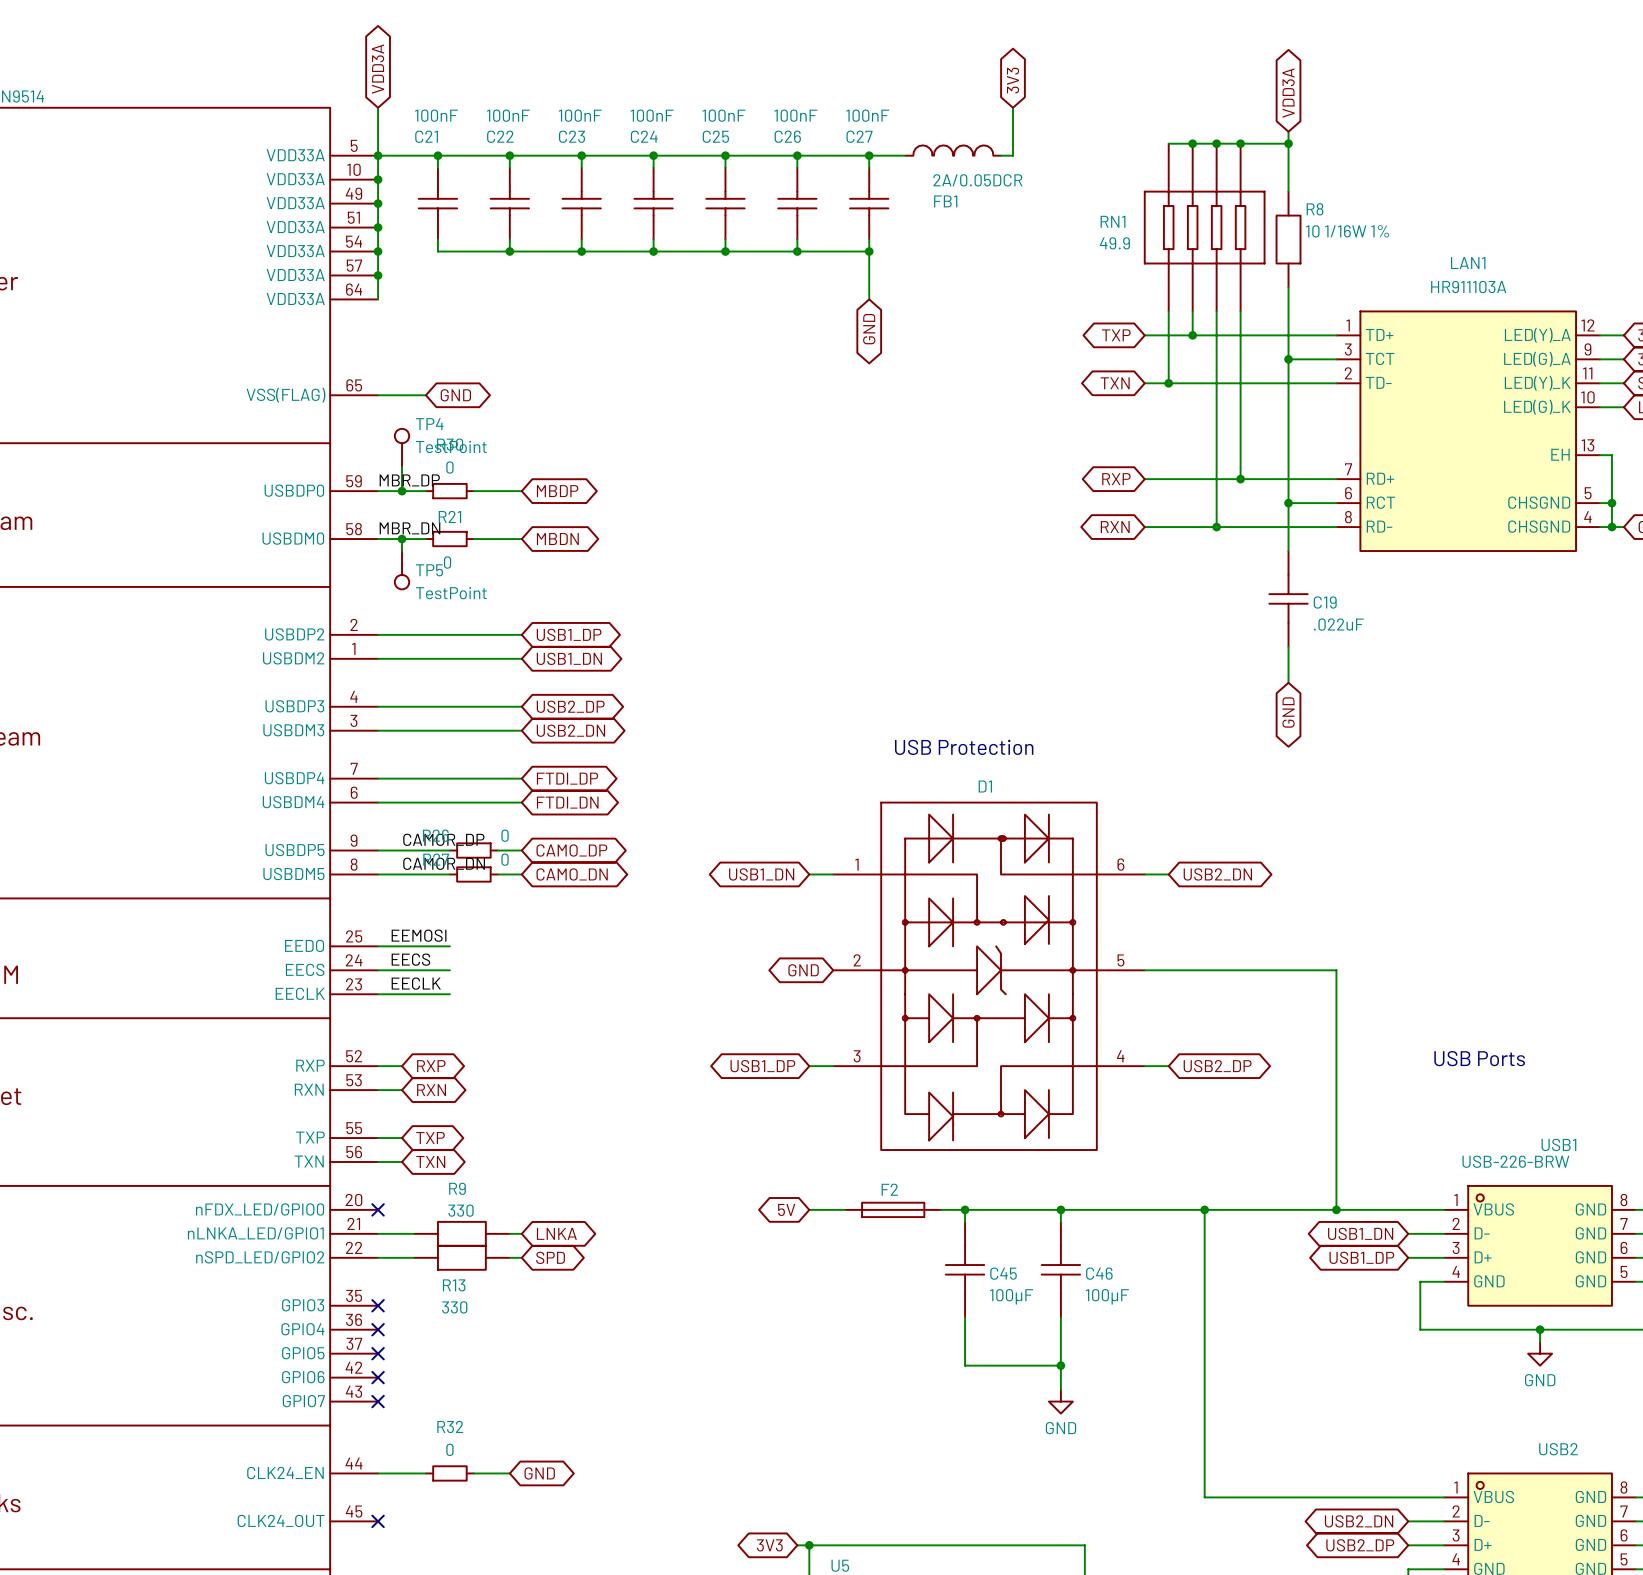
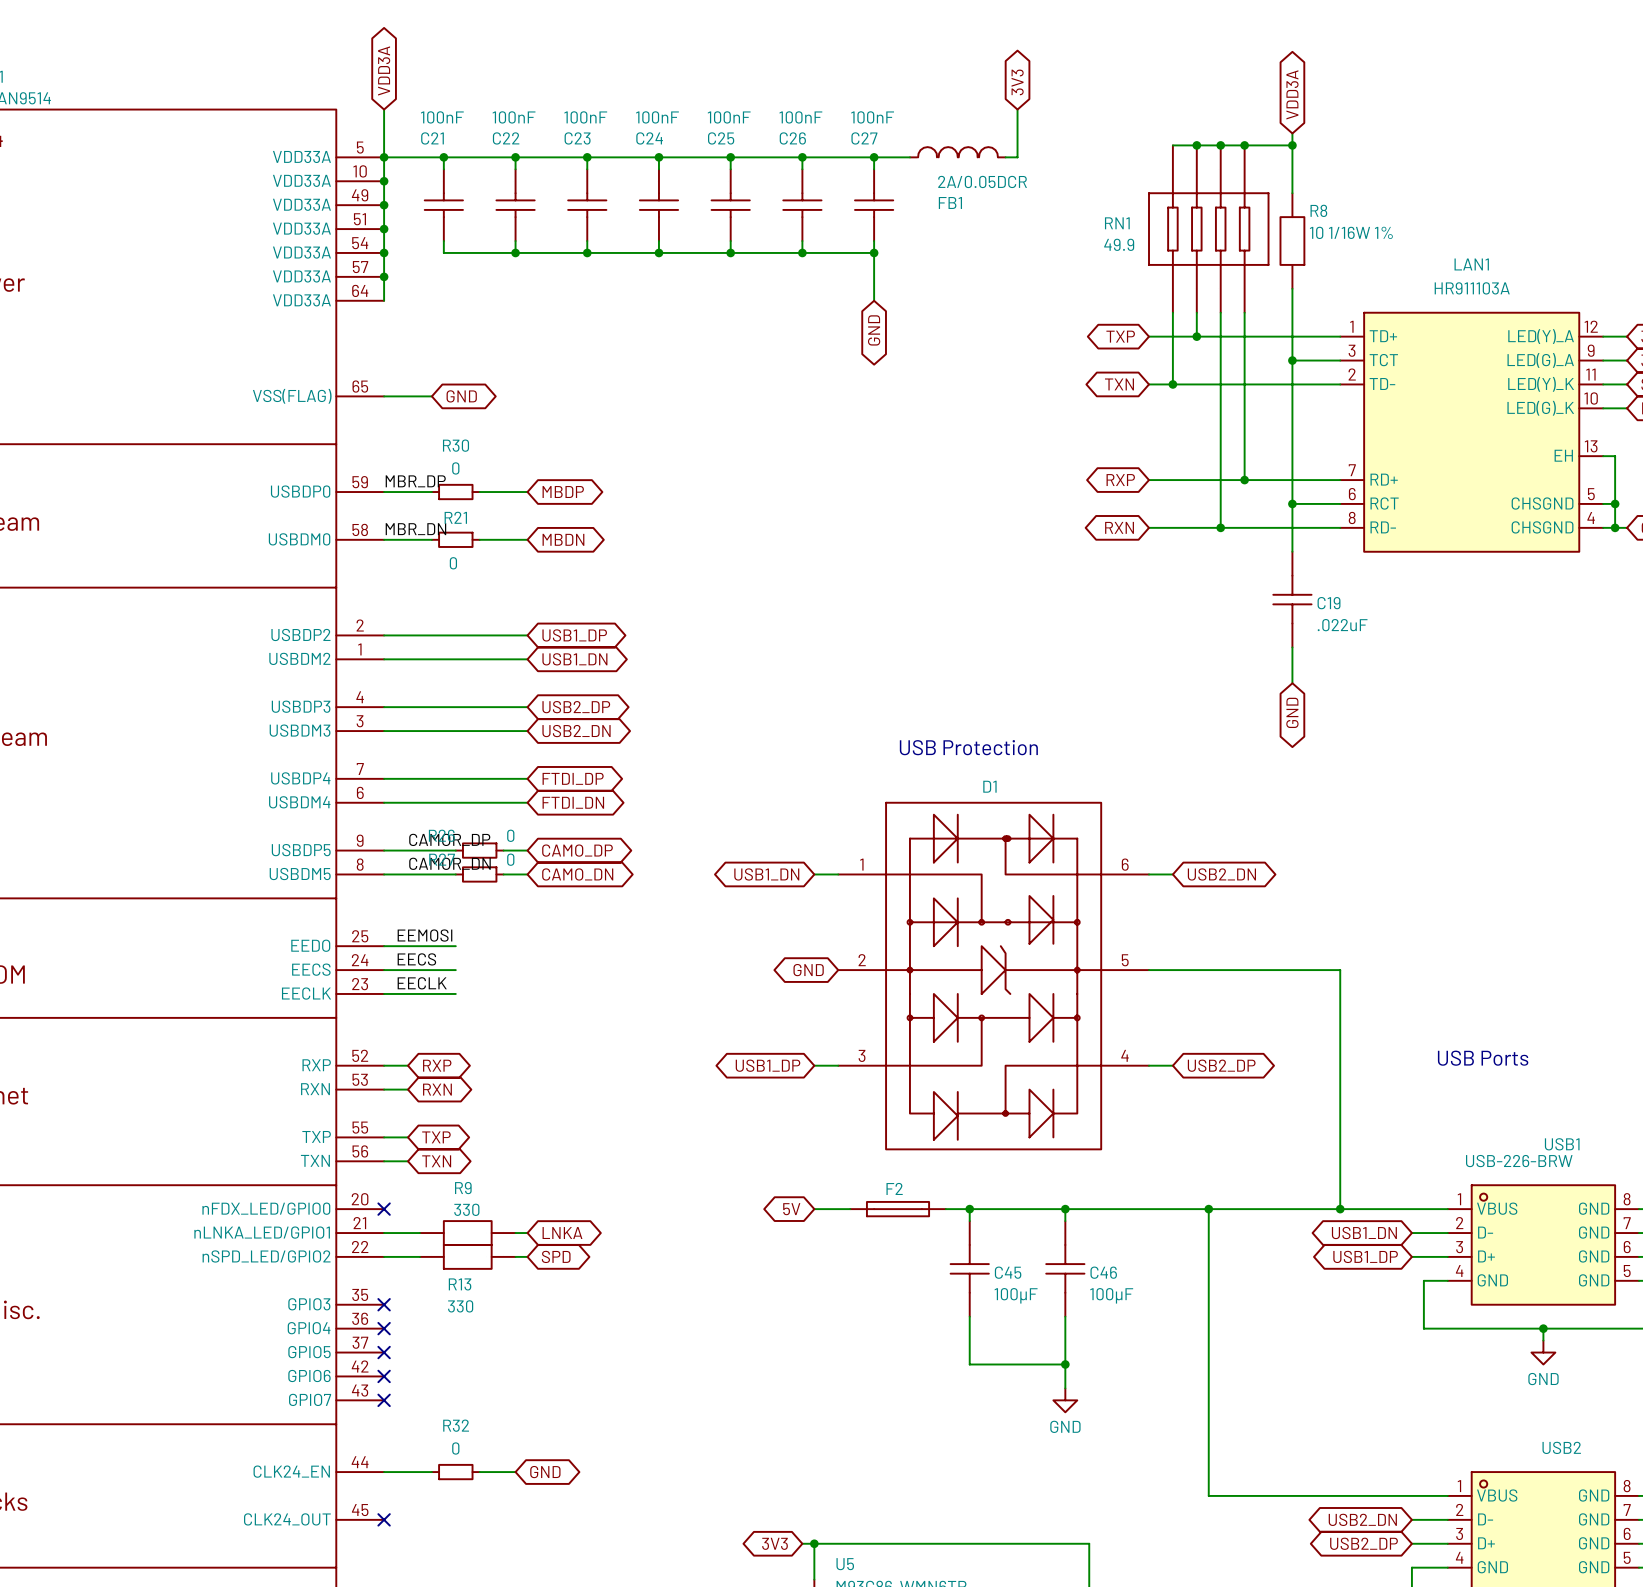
TP4: TestPoint (402, 447) -> none
wire: (402, 467) (402, 491) -> none
junction: (402, 491) -> none
wire: (402, 539) (402, 551) -> none
junction: (402, 539) -> none
TP5: TestPoint (402, 570) -> none

